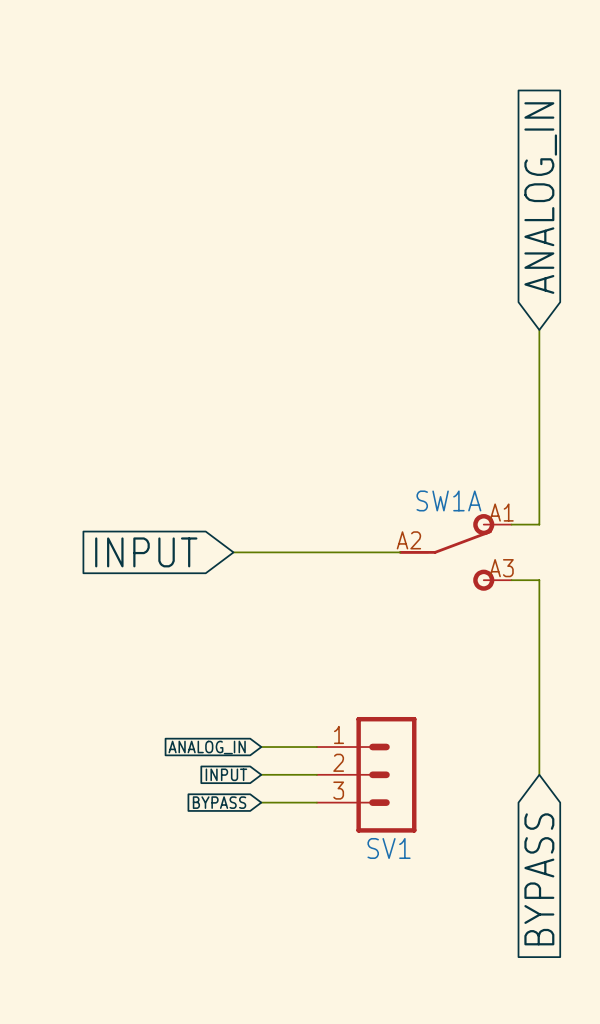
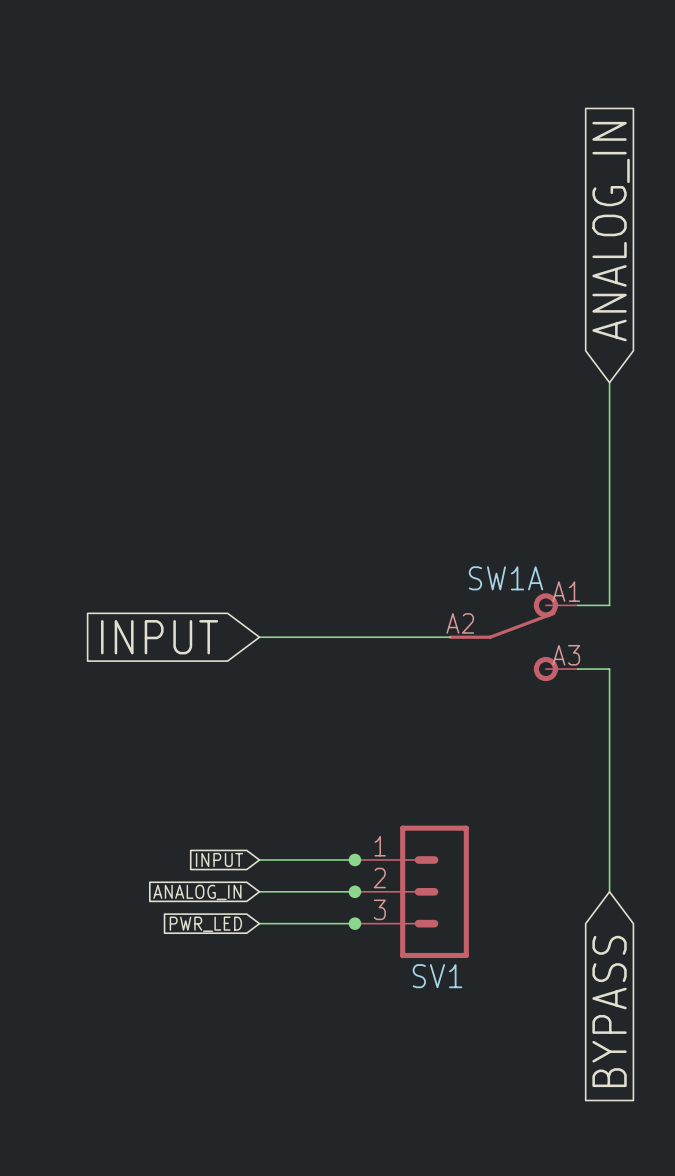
global label position: ANALOG_IN (207, 747) -> ANALOG_IN (197, 892)
wire: none -> (259, 859) (291, 859)
junction: none -> (354, 859)
global label position: INPUT (226, 774) -> INPUT (219, 859)
wire: none -> (259, 891) (291, 891)
junction: none -> (354, 891)
global label: BYPASS (219, 802) -> none
wire: none -> (259, 923) (291, 923)
junction: none -> (354, 923)
global label: none -> PWR_LED (205, 924)

